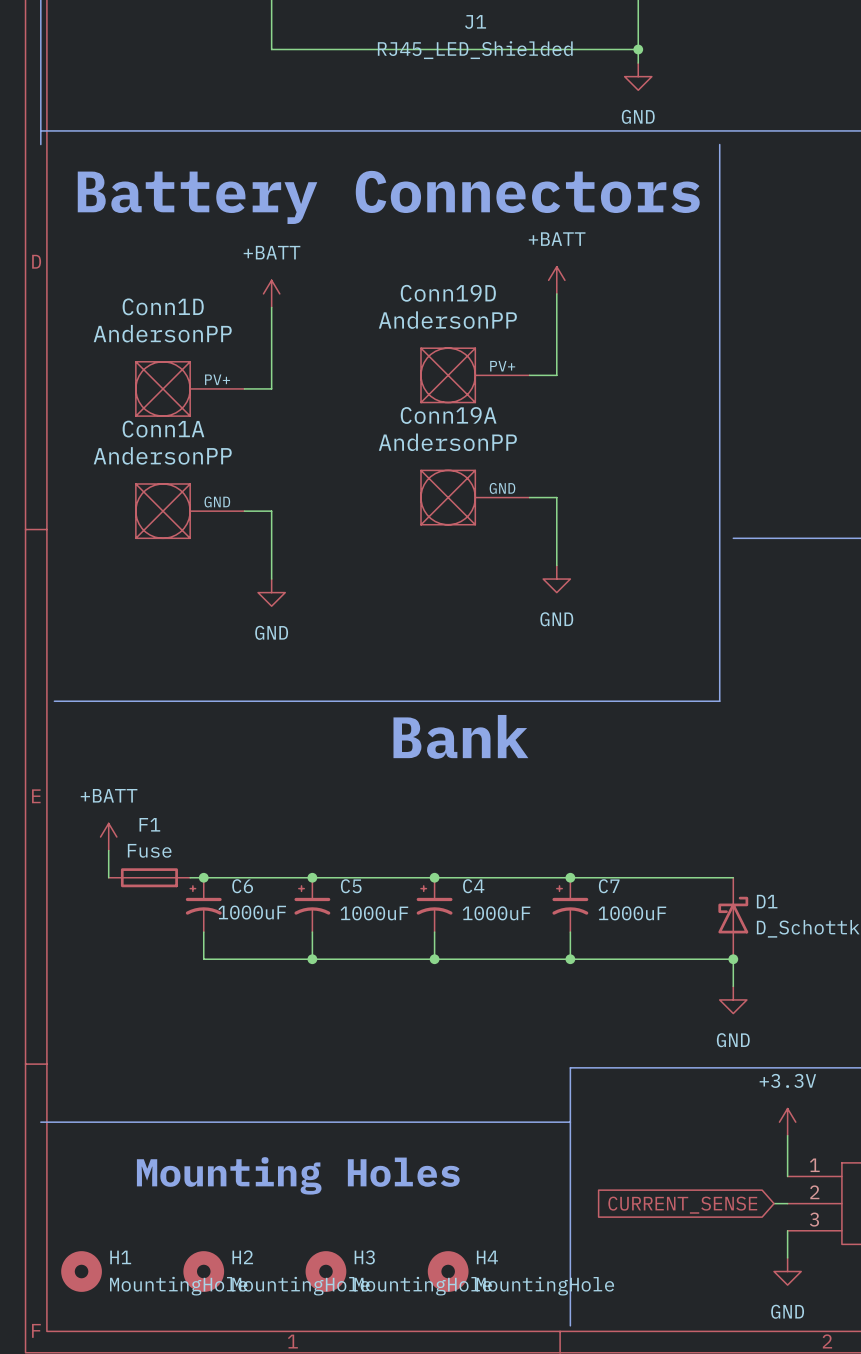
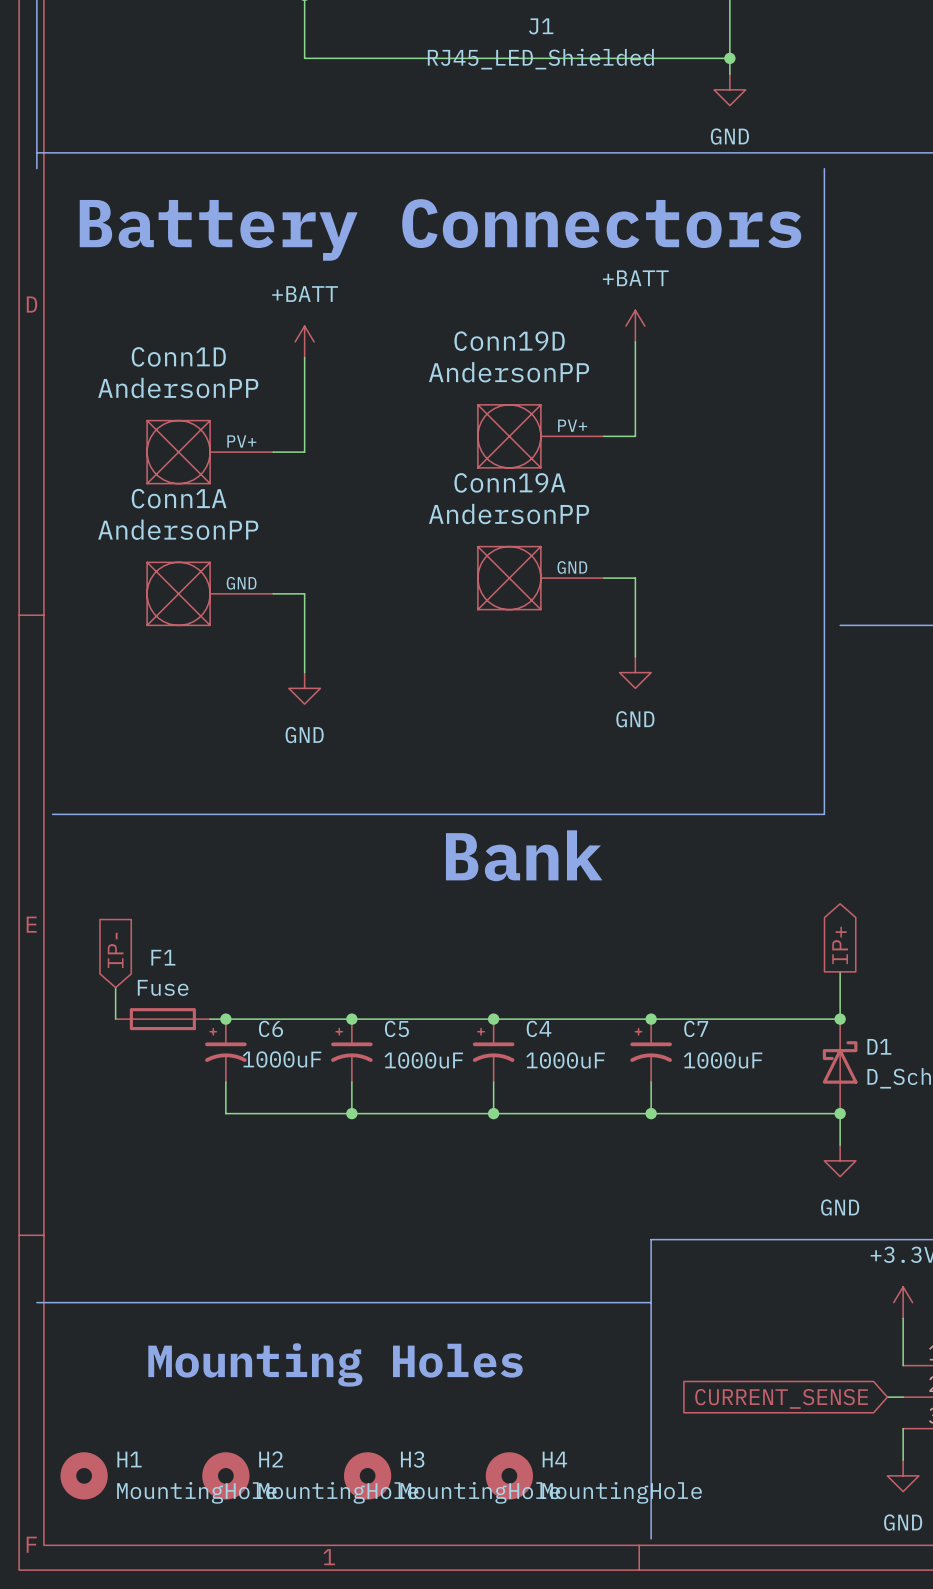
global label: none -> IP+ (840, 945)
global label: none -> IP- (115, 950)
power symbol: +BATT (108, 837) -> none
wire: none -> (840, 971) (840, 1019)
junction: none -> (840, 1019)

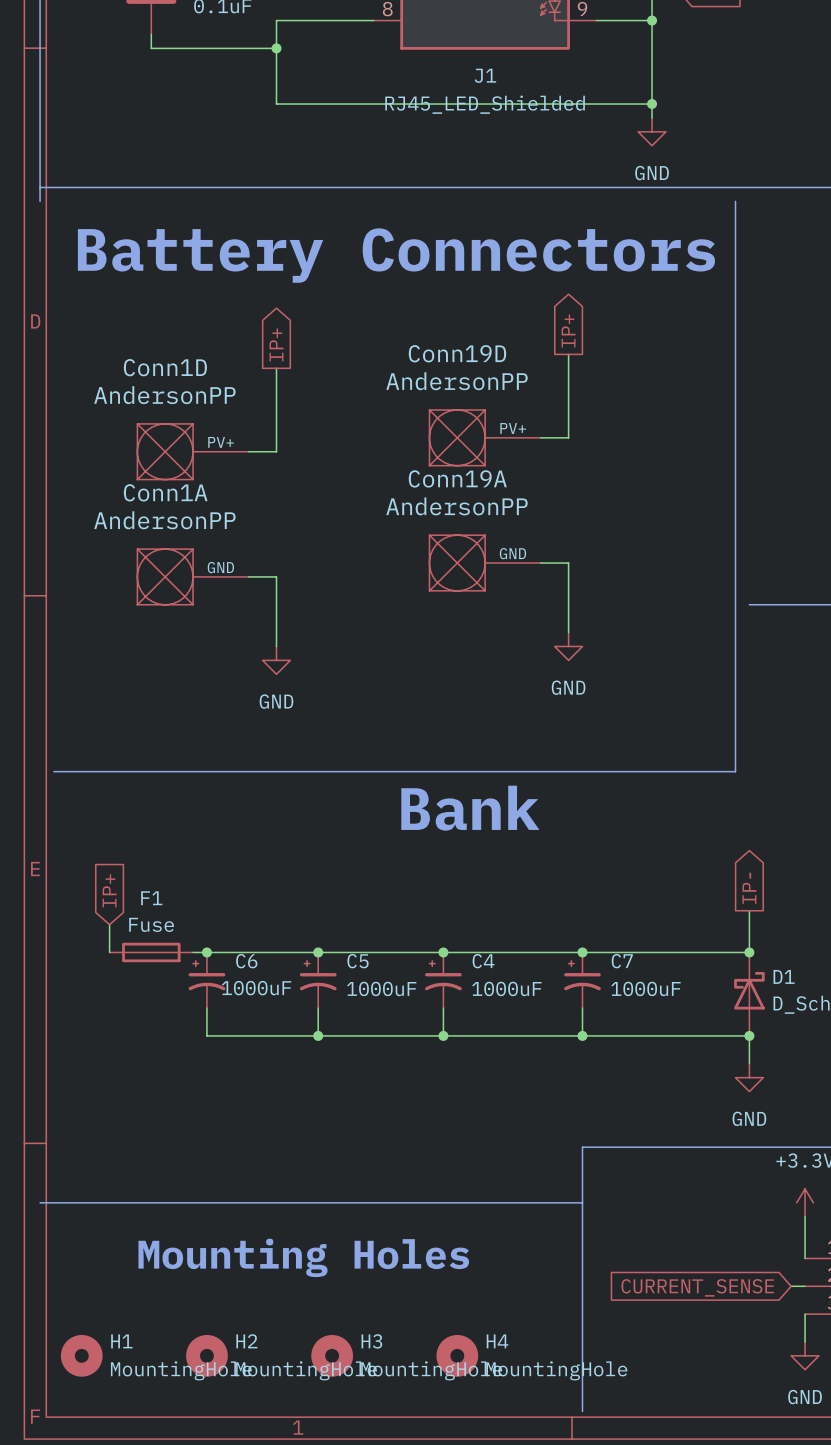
global label: none -> IP+ (568, 331)
power symbol: +BATT (635, 326) -> none
global label: none -> IP+ (276, 344)
power symbol: +BATT (304, 341) -> none
global label: IP+ (840, 945) -> IP- (749, 888)
global label: IP- (115, 950) -> IP+ (109, 890)

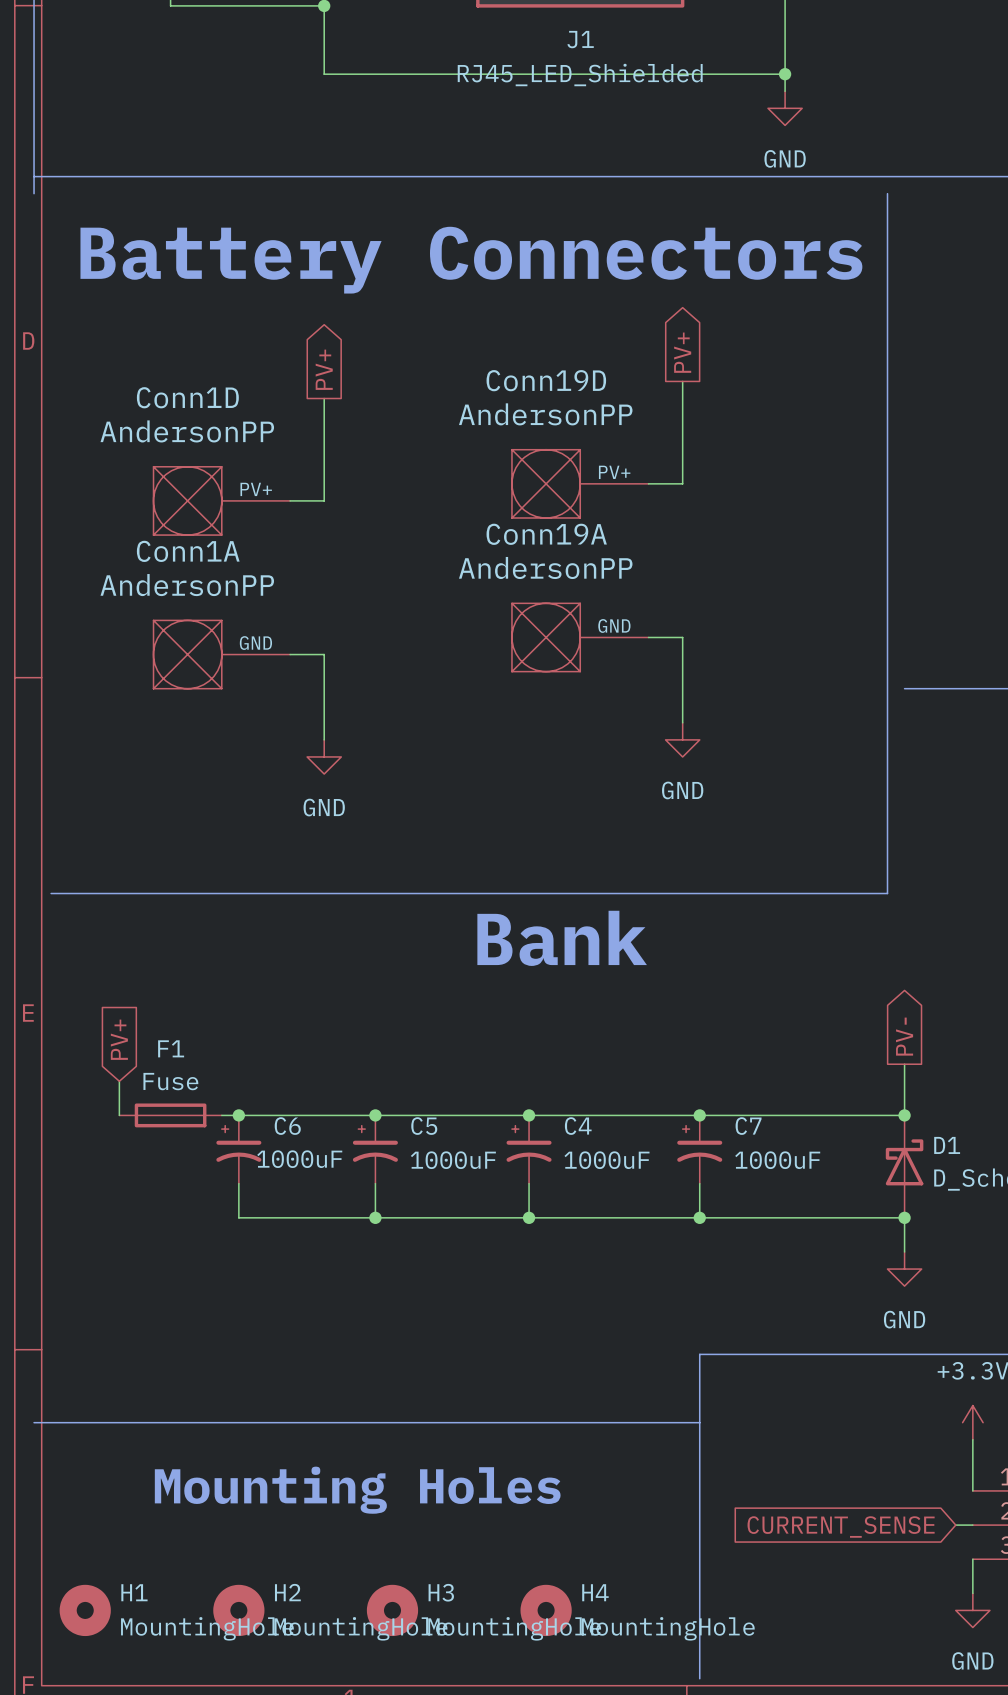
global label: IP+ (568, 331) -> PV+ (682, 352)
global label: IP+ (276, 344) -> PV+ (324, 369)
global label: IP- (749, 888) -> PV- (904, 1036)
global label: IP+ (109, 890) -> PV+ (119, 1039)

